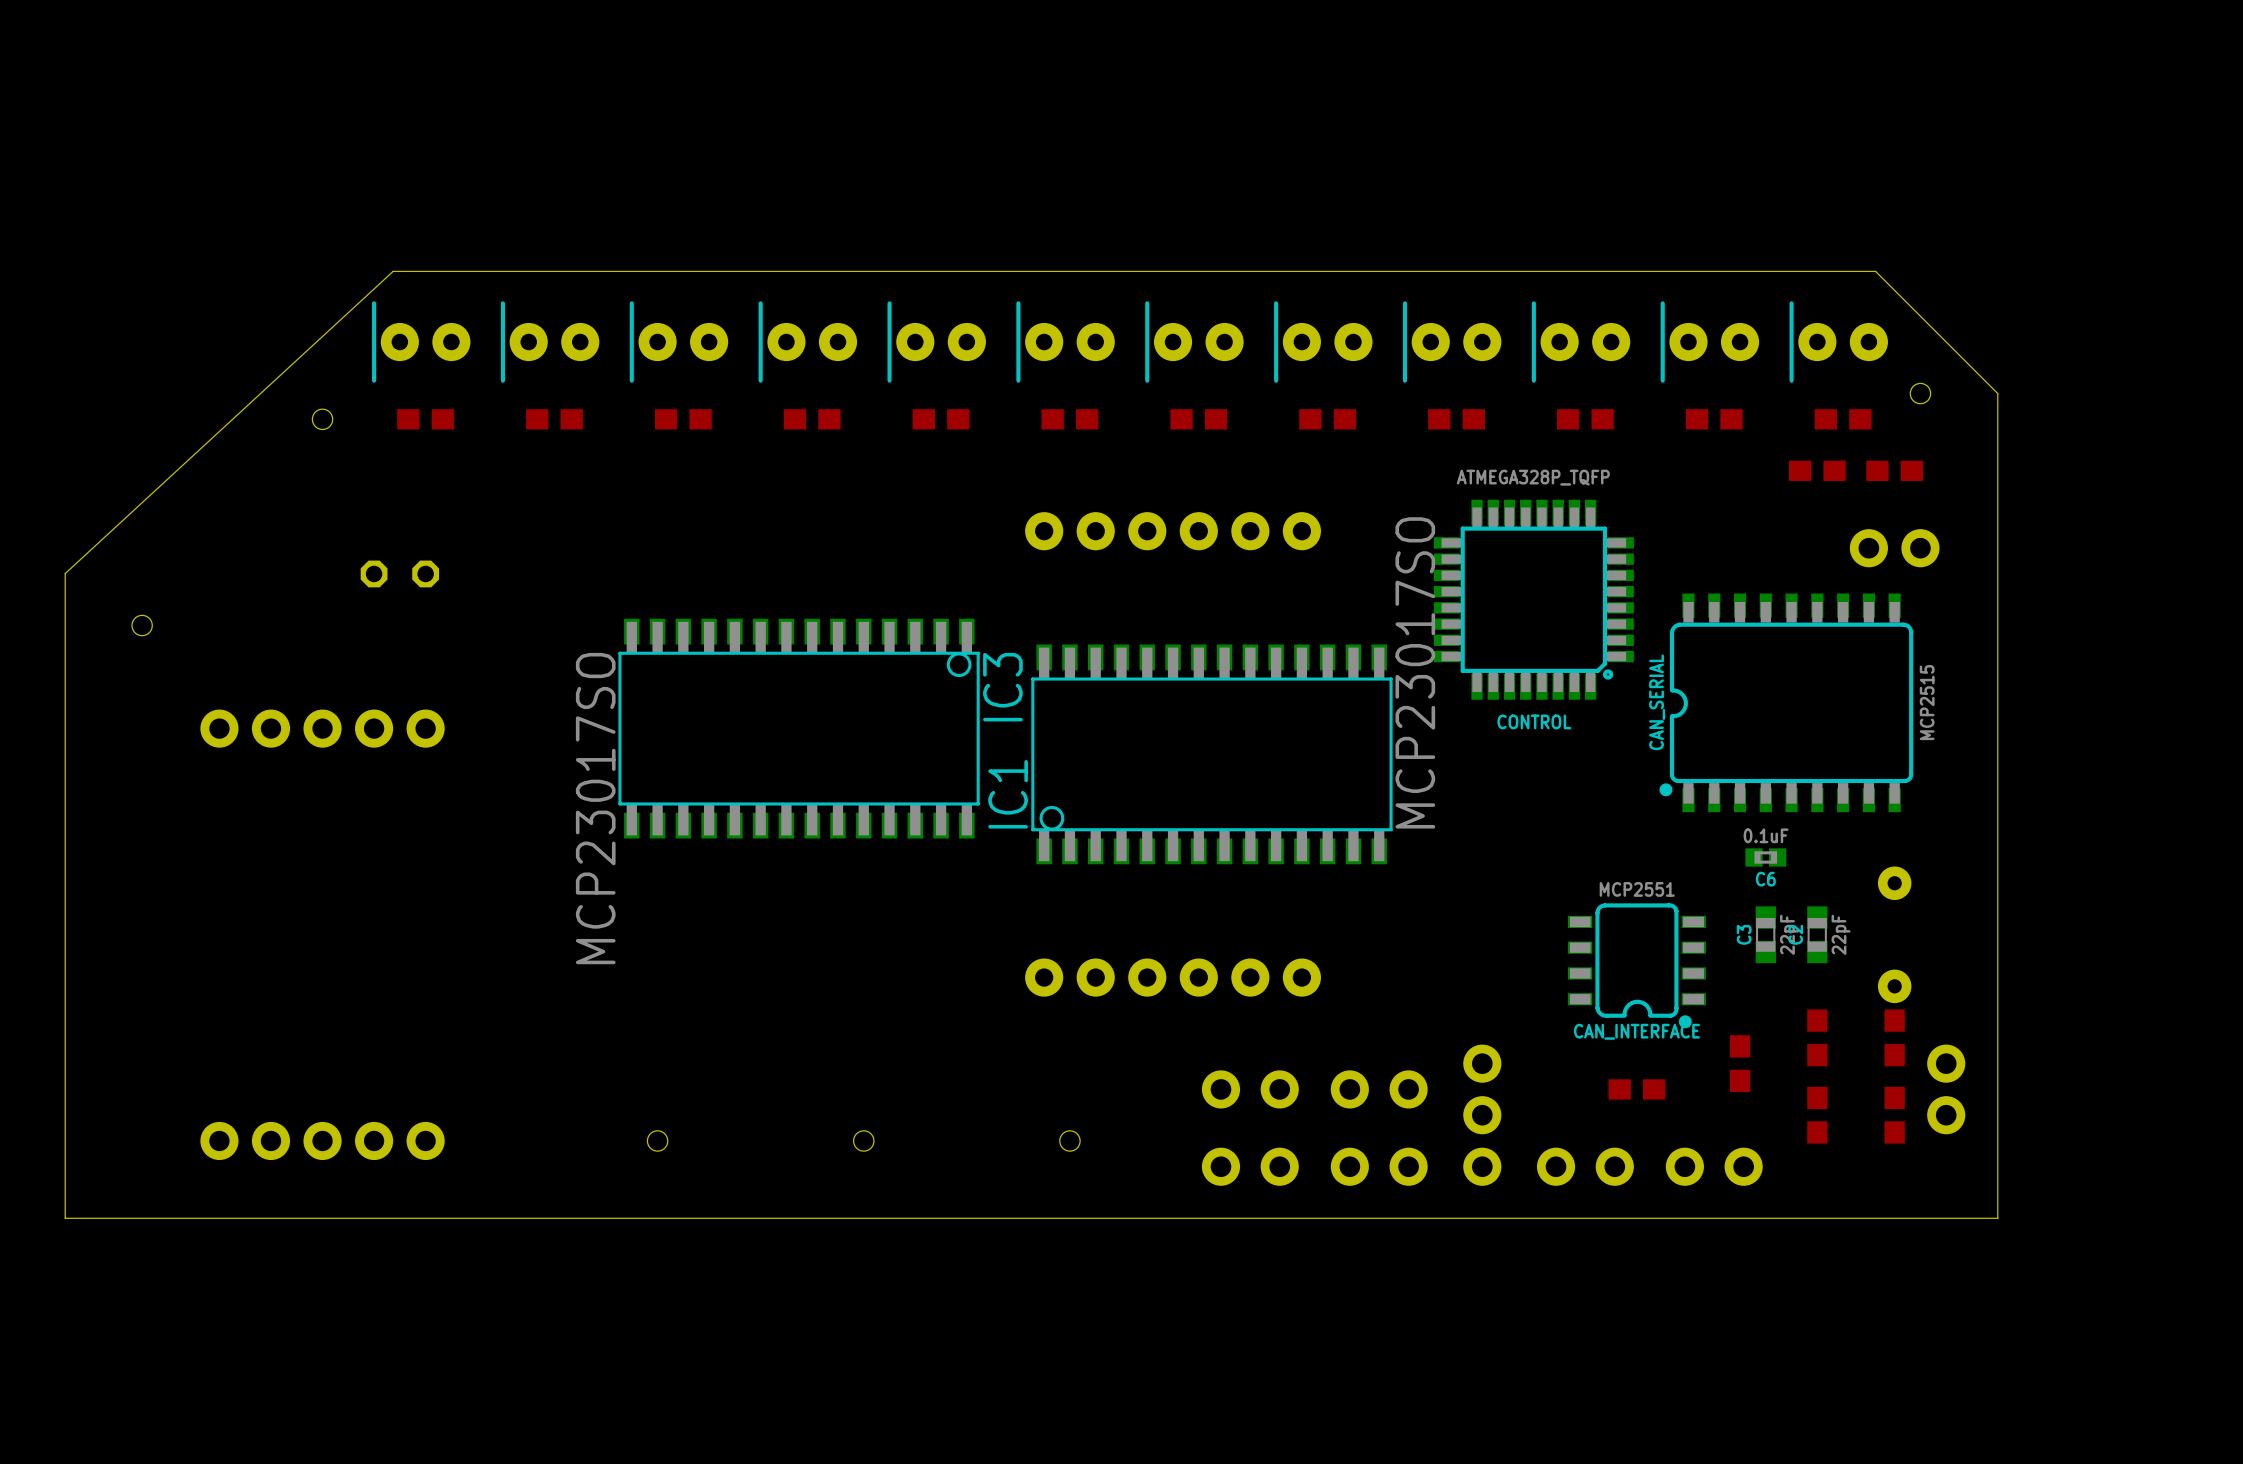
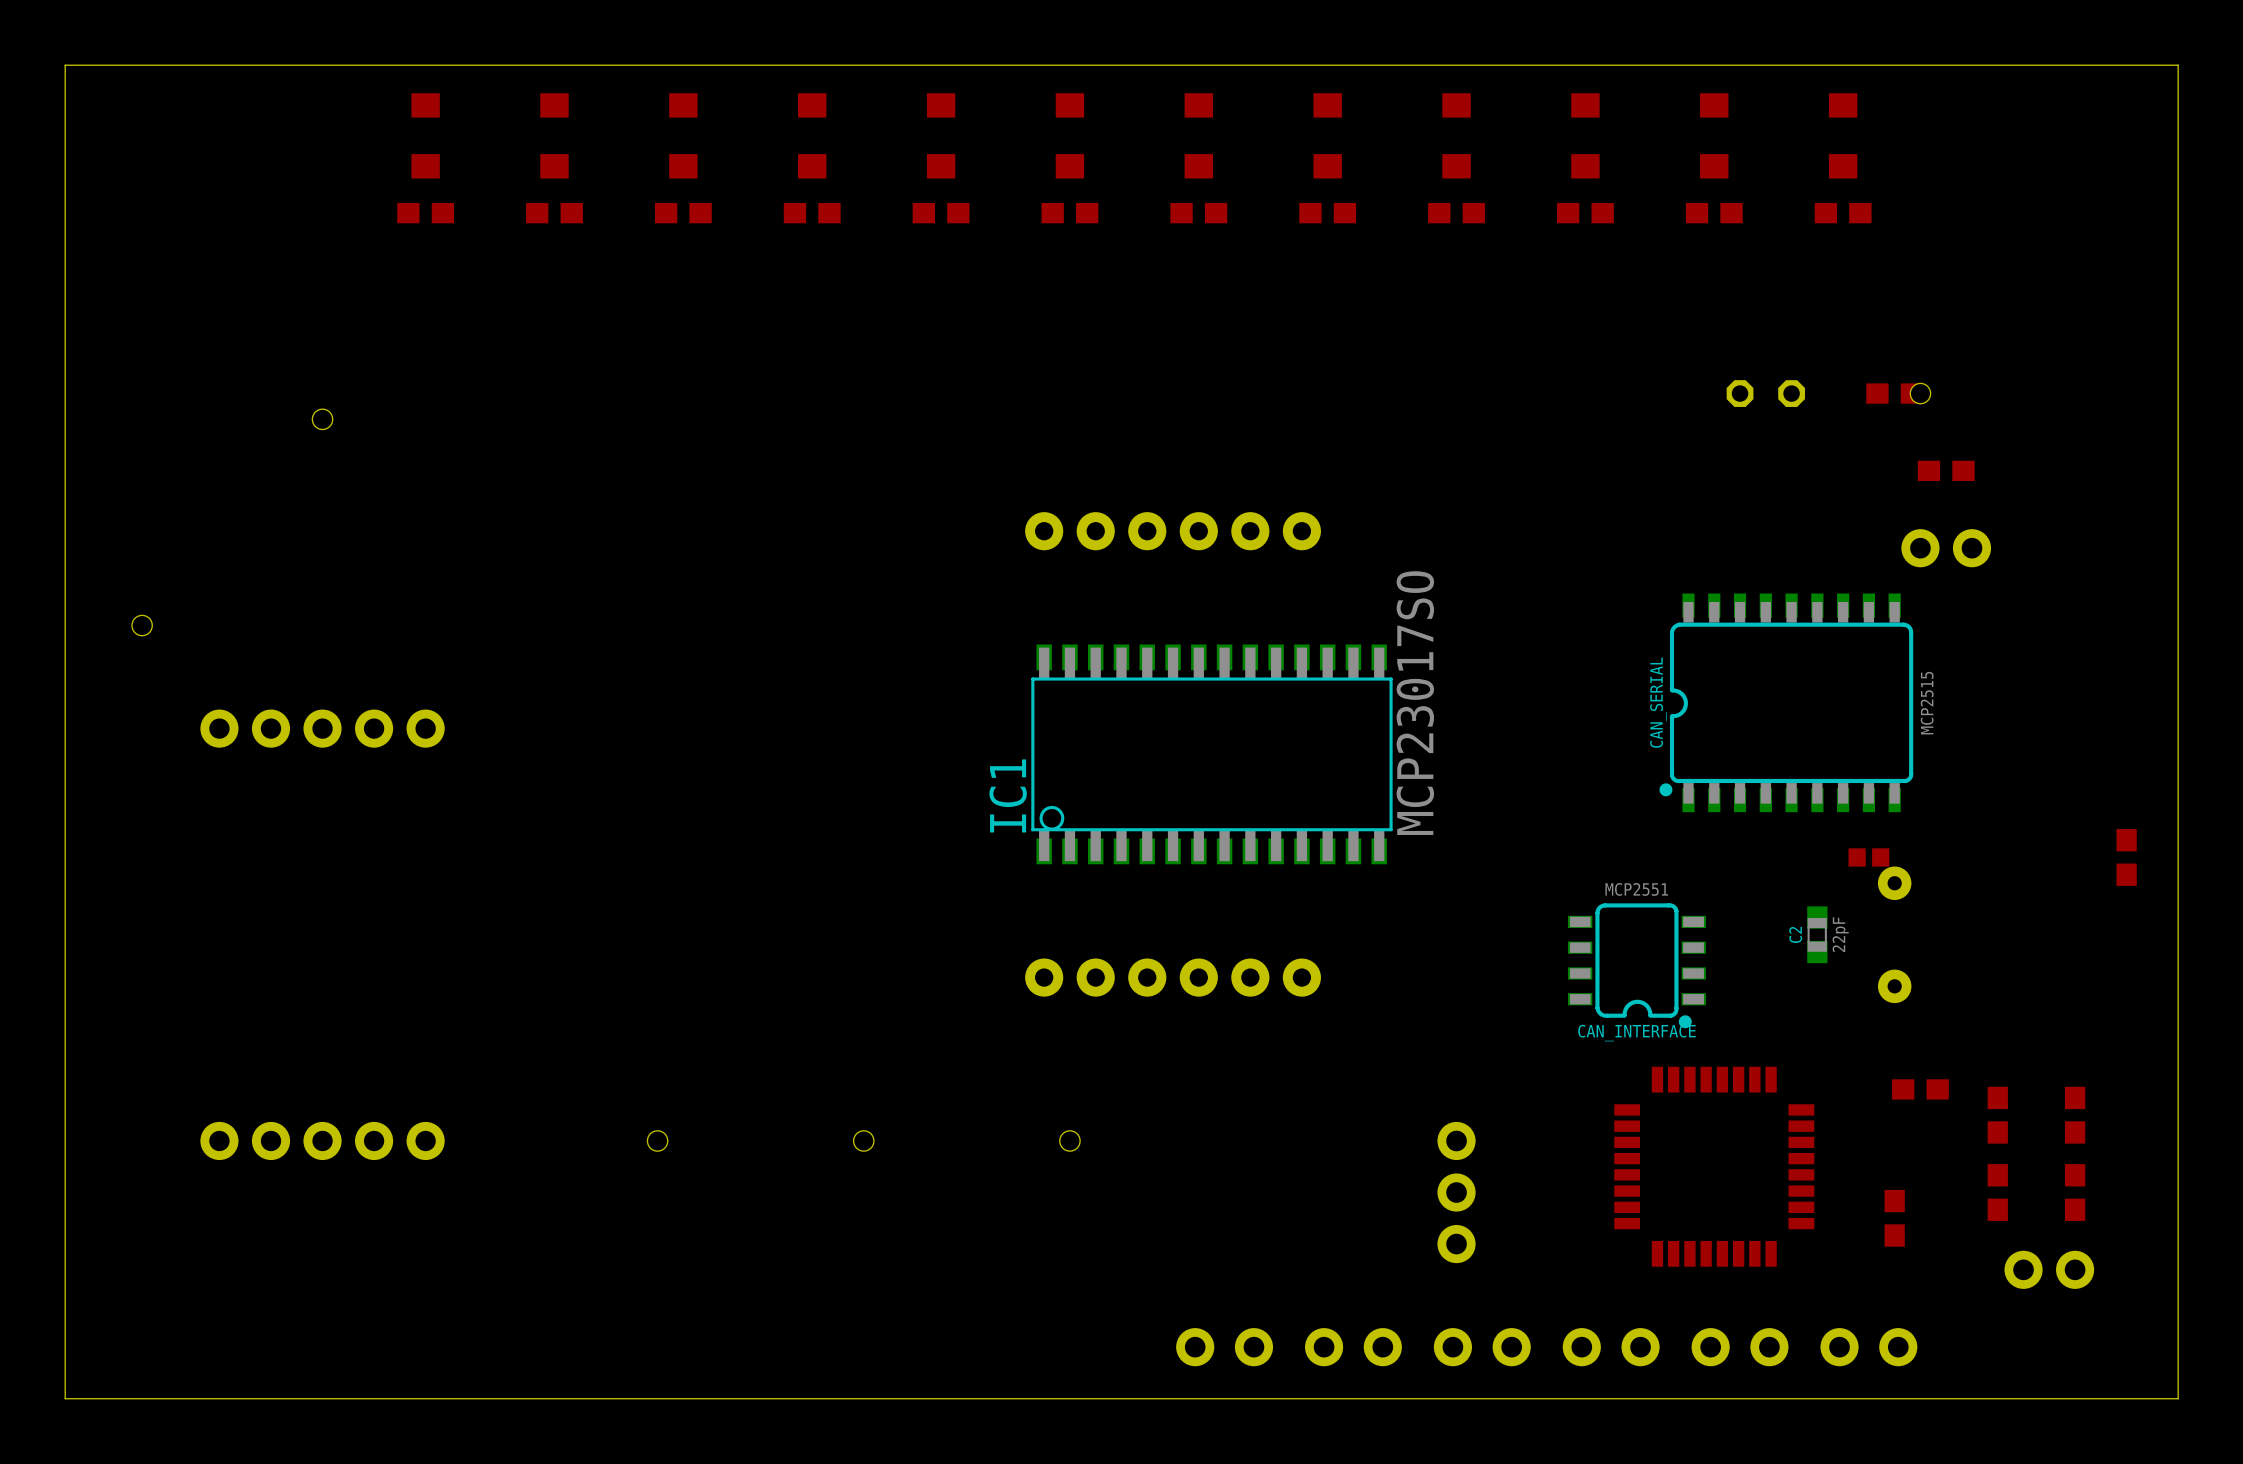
part: none -> (425, 135)
part: none -> (554, 135)
part: none -> (683, 135)
part: none -> (812, 135)
part: none -> (941, 135)
part: none -> (1069, 135)
part: none -> (1198, 135)
part: none -> (1327, 135)
part: none -> (1456, 135)
part: none -> (1585, 135)
part: none -> (1714, 135)
part: none -> (1843, 135)
part: none -> (425, 213)
part: none -> (554, 213)
part: none -> (683, 213)
part: none -> (812, 213)
part: none -> (941, 213)
part: none -> (1069, 213)
part: none -> (1198, 213)
part: none -> (1327, 213)
part: none -> (1456, 213)
part: none -> (1585, 213)
part: none -> (1714, 213)
part: none -> (1843, 213)
part: (421, 342) -> none
part: (550, 342) -> none
part: (678, 342) -> none
part: (807, 342) -> none
part: (936, 342) -> none
part: (1065, 342) -> none
part: (1194, 342) -> none
part: (1323, 342) -> none
part: (1452, 342) -> none
part: (1581, 342) -> none
part: (1709, 342) -> none
part: (1838, 342) -> none
part: none -> (1765, 393)
part: none -> (1894, 393)
part: (425, 419) -> none
part: (554, 419) -> none
part: (683, 419) -> none
part: (812, 419) -> none
part: (941, 419) -> none
part: (1069, 419) -> none
part: (1198, 419) -> none
part: (1327, 419) -> none
part: (1456, 419) -> none
part: (1585, 419) -> none
part: (1714, 419) -> none
part: (1843, 419) -> none
part: (1817, 470) -> none
part: (1894, 470) -> none
part: none -> (1946, 470)
part position: (1894, 548) -> (1946, 548)
board edge: (65, 573) (393, 271) (1875, 271) (1997, 393) (1997, 1218) (65, 1218) -> (65, 573) (65, 65) (2178, 65) (2178, 1398) (65, 1398) (65, 1218)
part: (399, 573) -> none
CONTROL: ATMEGA328P_TQFP (1533, 599) -> none
IC3: MCP23017SO (799, 728) -> none
C6 side: bottom (1765, 857) -> top (1868, 857)
C3 side: bottom (1765, 934) -> top (2126, 857)
part: (1817, 1037) -> none
part: (1894, 1037) -> none
part: (1740, 1063) -> none
part: (1250, 1089) -> none
part: (1379, 1089) -> none
part: (1636, 1089) -> none
part: none -> (1920, 1089)
part rotation: 0° (1946, 1089) -> 90° clockwise (2049, 1269)
part position: (1946, 1089) -> (2049, 1269)
part position: (1482, 1115) -> (1456, 1192)
part: (1817, 1115) -> none
part: (1894, 1115) -> none
part: none -> (1997, 1115)
part: none -> (2075, 1115)
part footprint: [1665, 1147, 1763, 1186] -> [1614, 1066, 1815, 1267]
part: (1250, 1166) -> none
part: (1379, 1166) -> none
part: (1585, 1166) -> none
part: none -> (1997, 1192)
part: none -> (2075, 1192)
part: none -> (1894, 1218)
part: none -> (1224, 1347)
part: none -> (1353, 1347)
part: none -> (1482, 1347)
part: none -> (1611, 1347)
part: none -> (1740, 1347)
part: none -> (1868, 1347)

